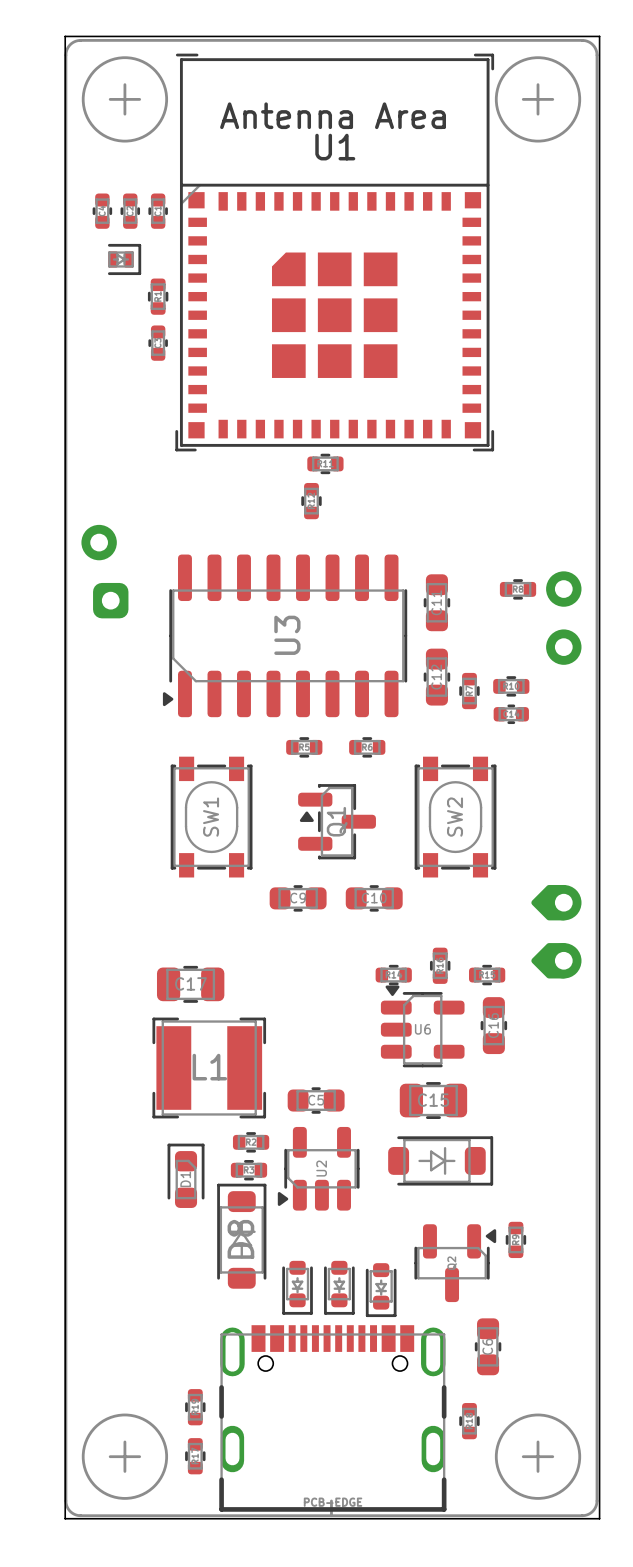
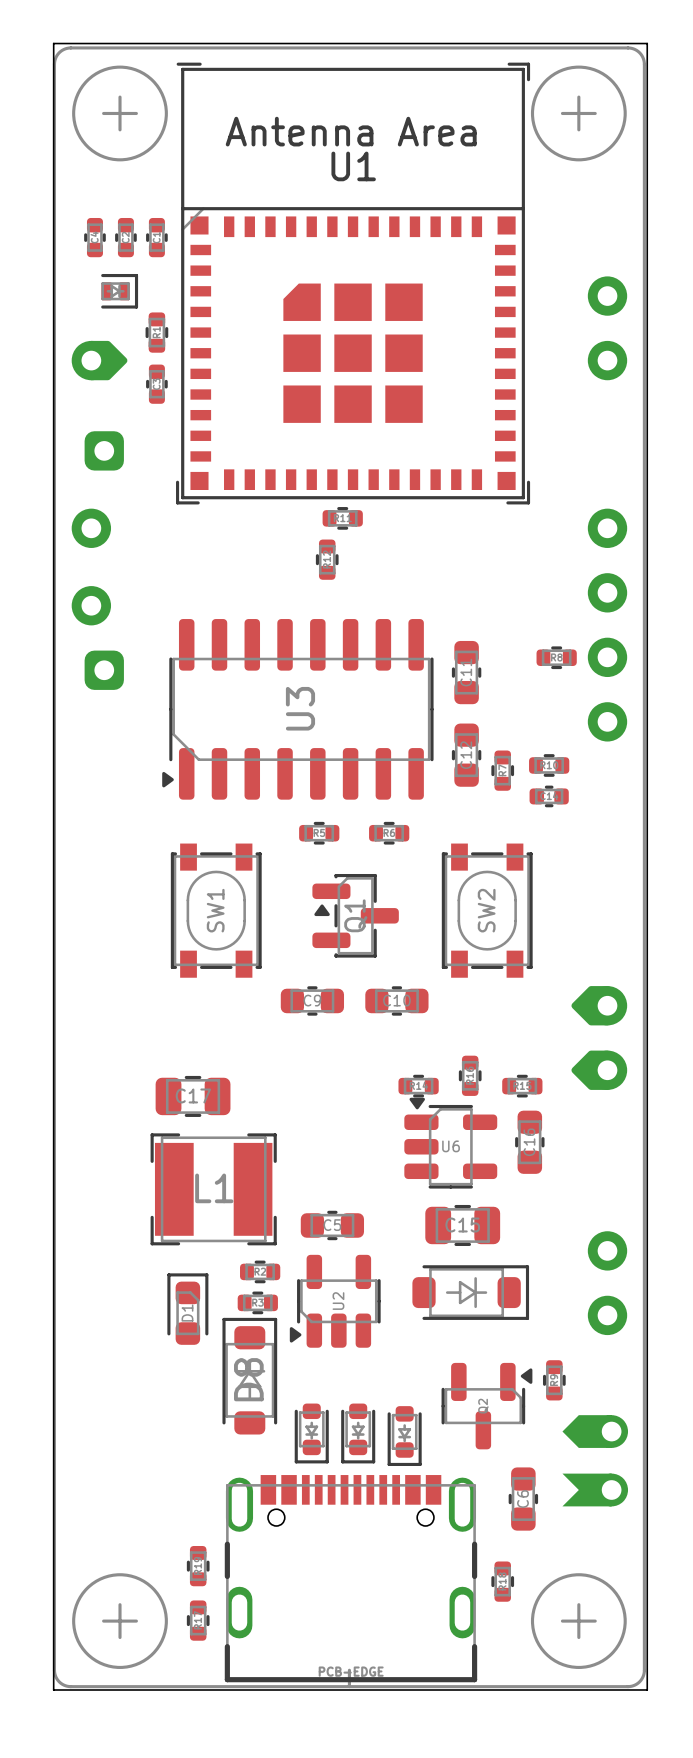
part footprint: [64, 38, 599, 1518] -> [52, 46, 646, 1689]

